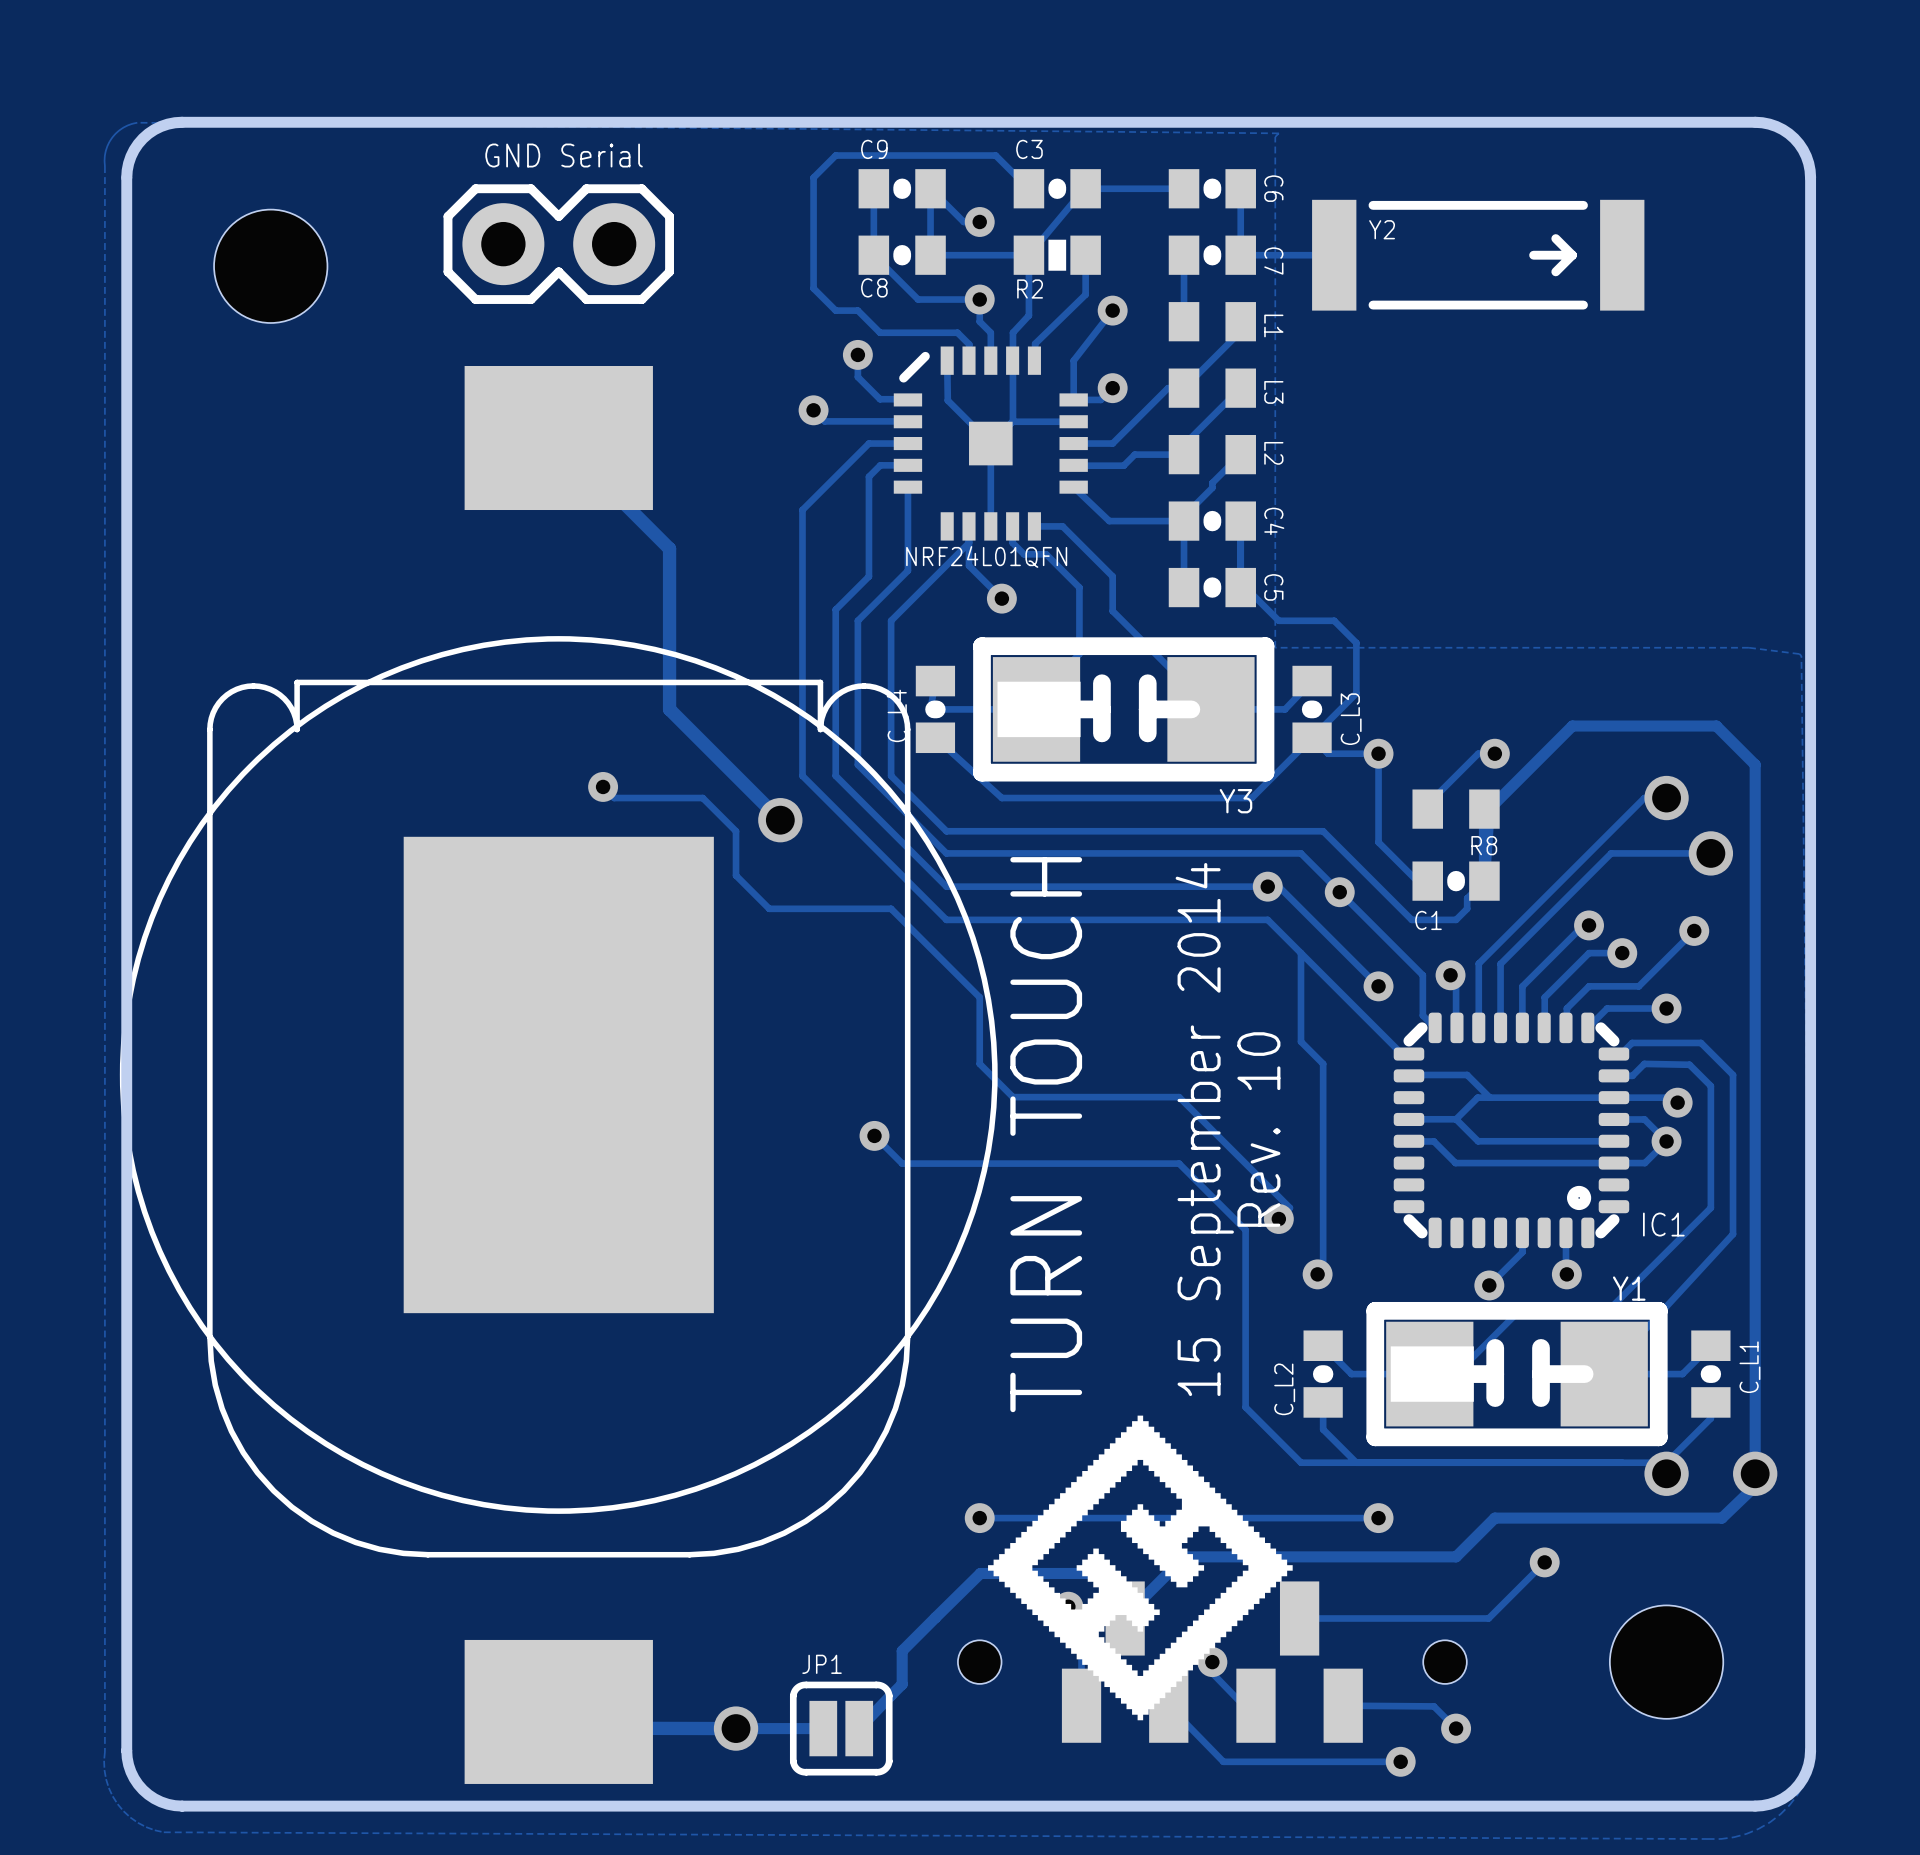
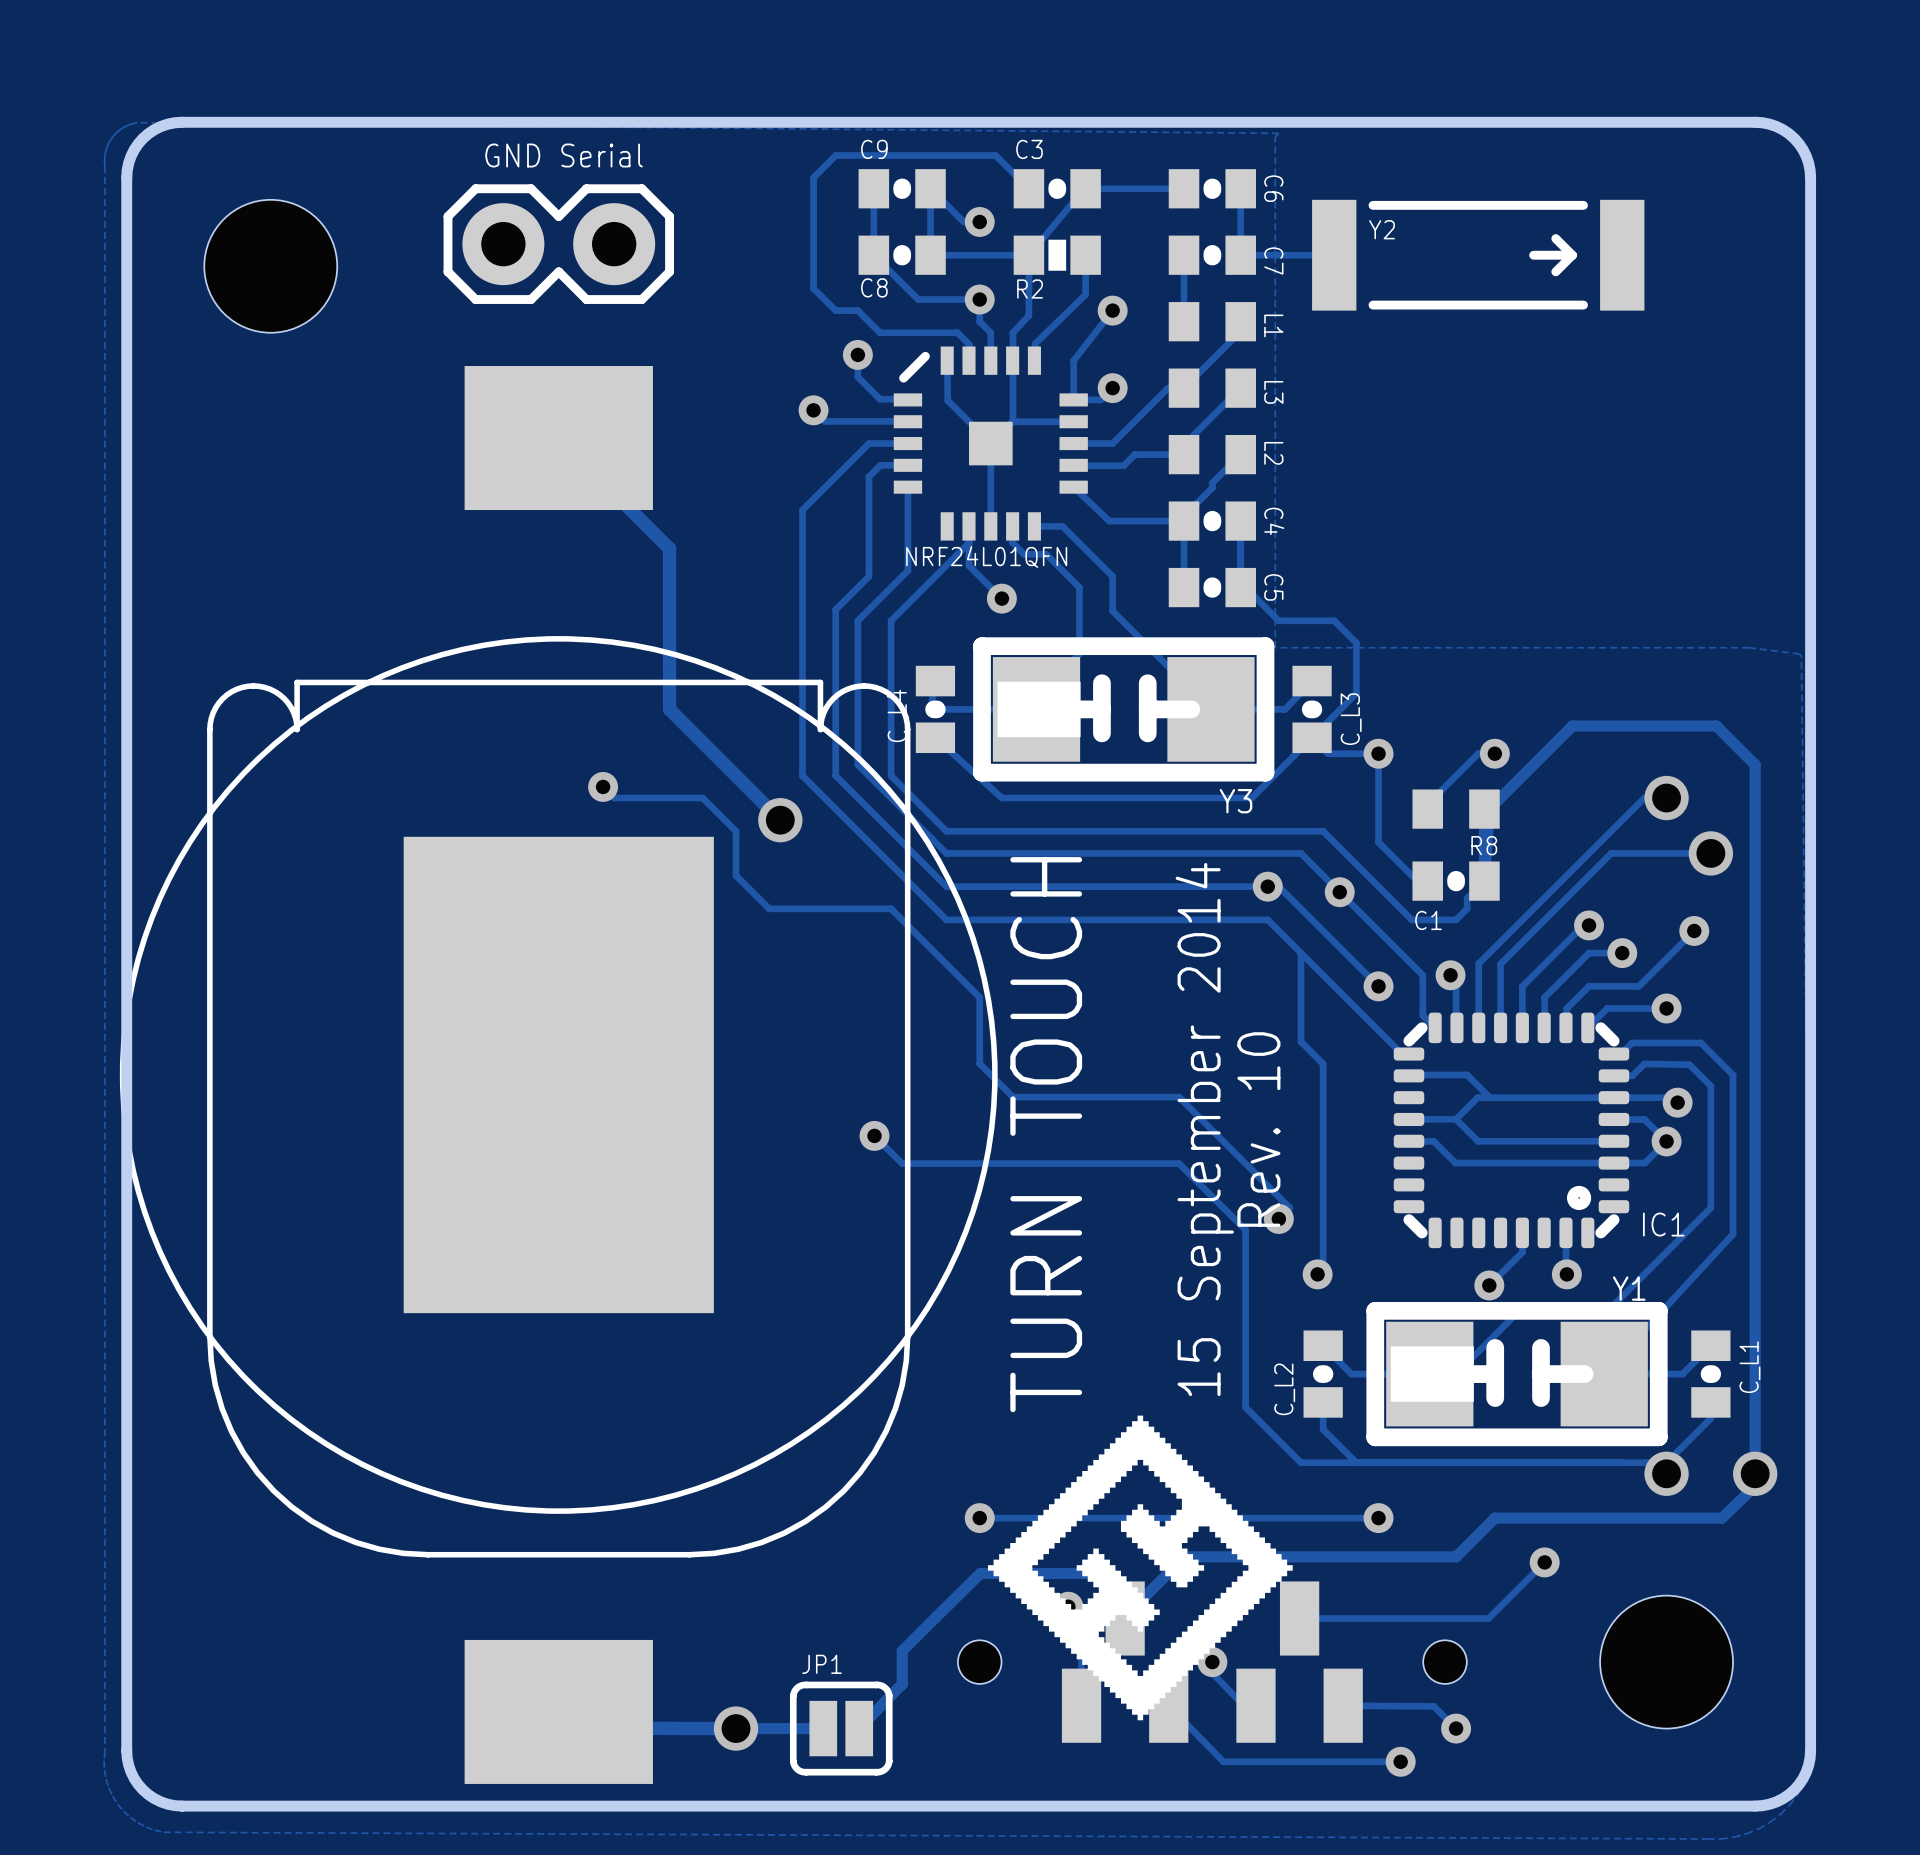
hole size: [214, 209, 328, 323] -> [204, 199, 338, 333]
hole size: [1609, 1605, 1724, 1719] -> [1600, 1595, 1734, 1729]

